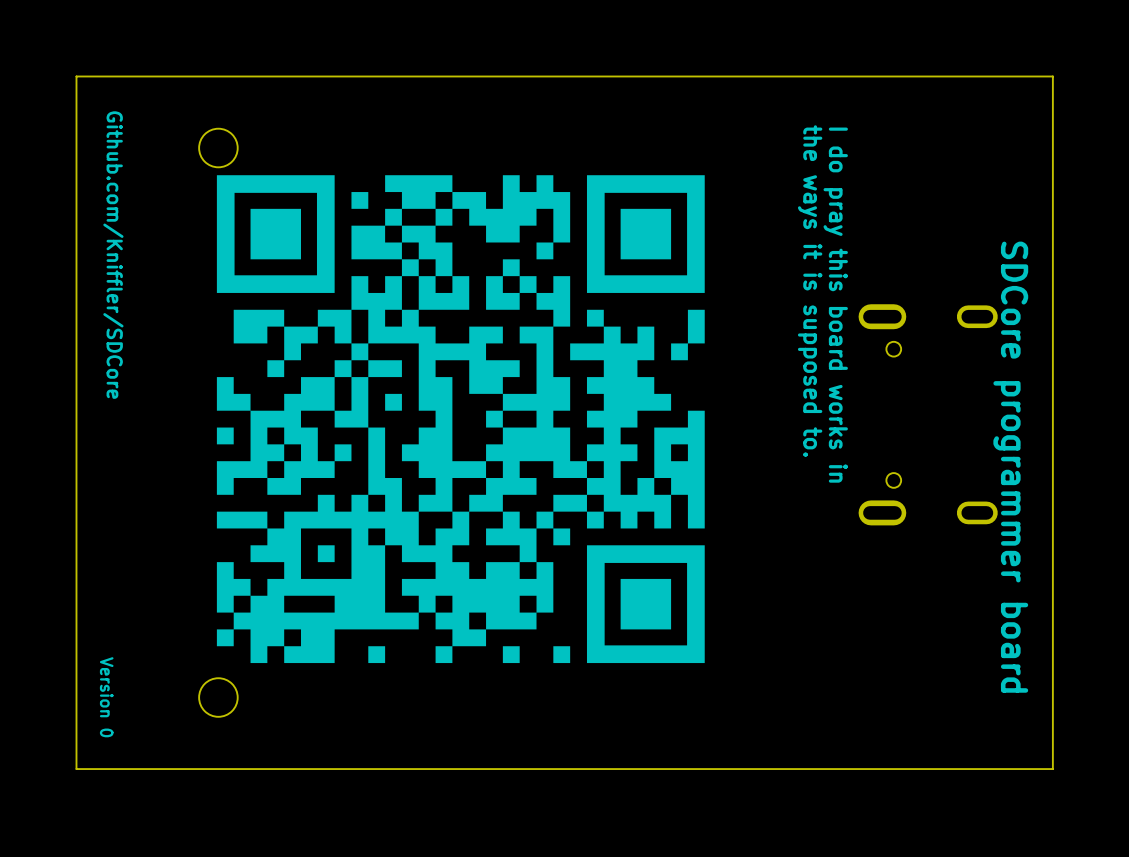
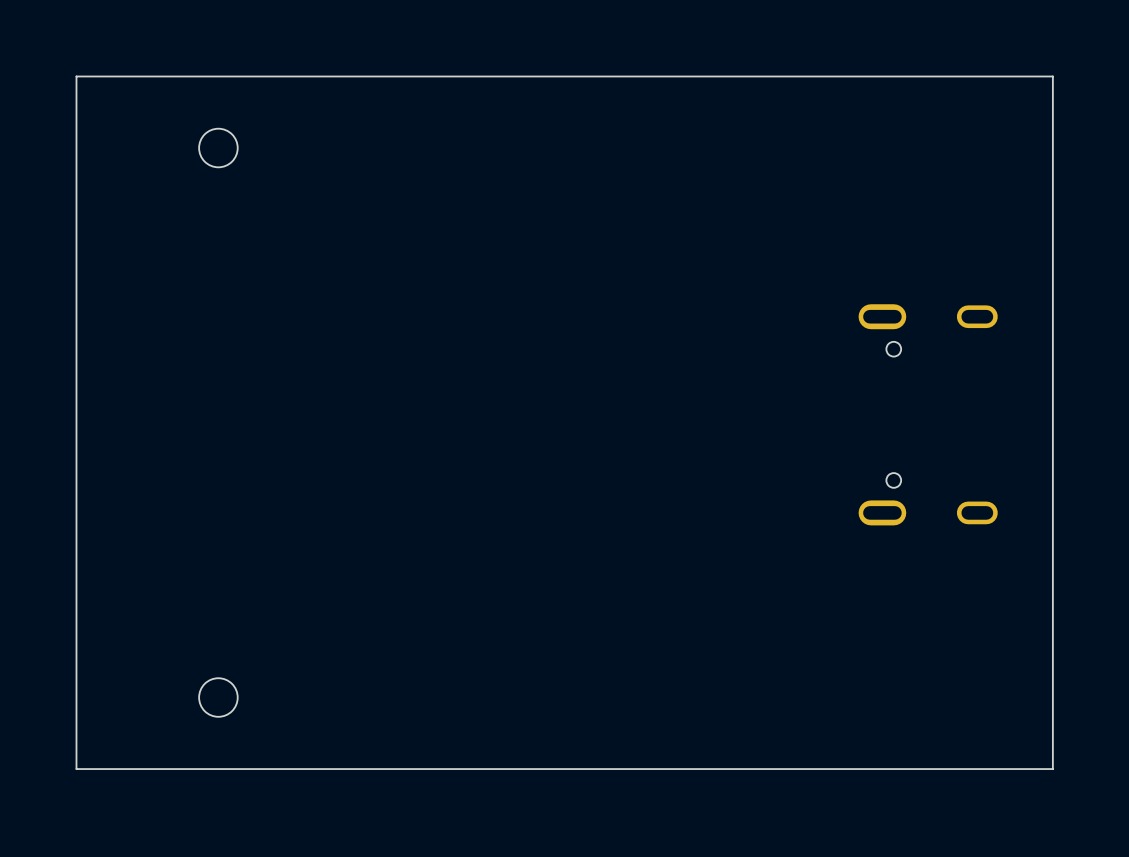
drawing: [216, 175, 705, 664] -> none
text: Github.com/Kniffler/SDCore (113, 255) -> none
text: the ways it is supposed to. (810, 291) -> none
text: I do pray this board works in (835, 305) -> none
text: SDCore programmer board (1010, 467) -> none
text: Version 0 (106, 697) -> none

